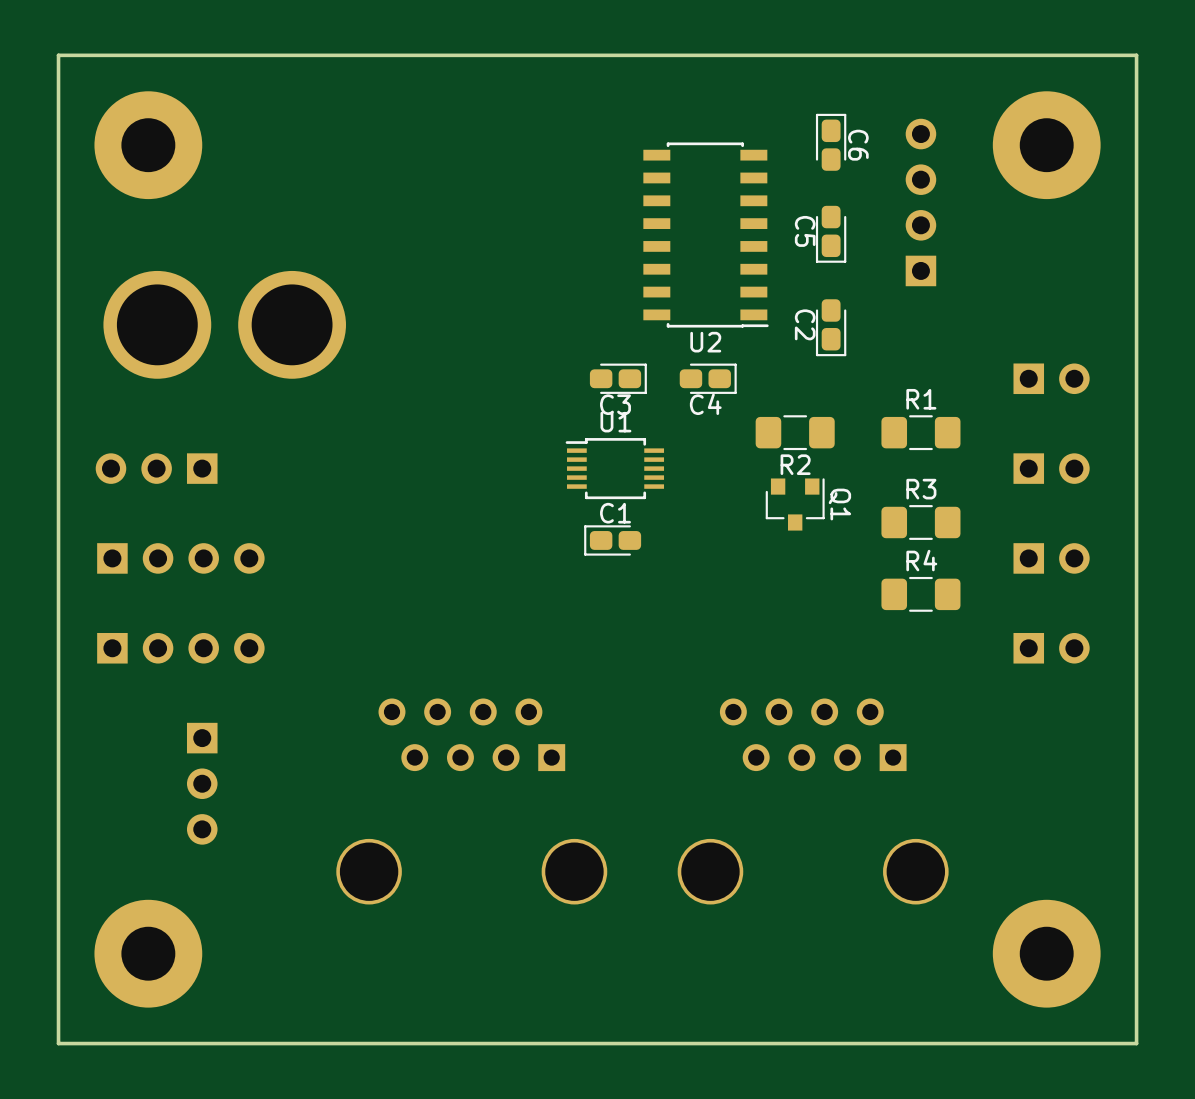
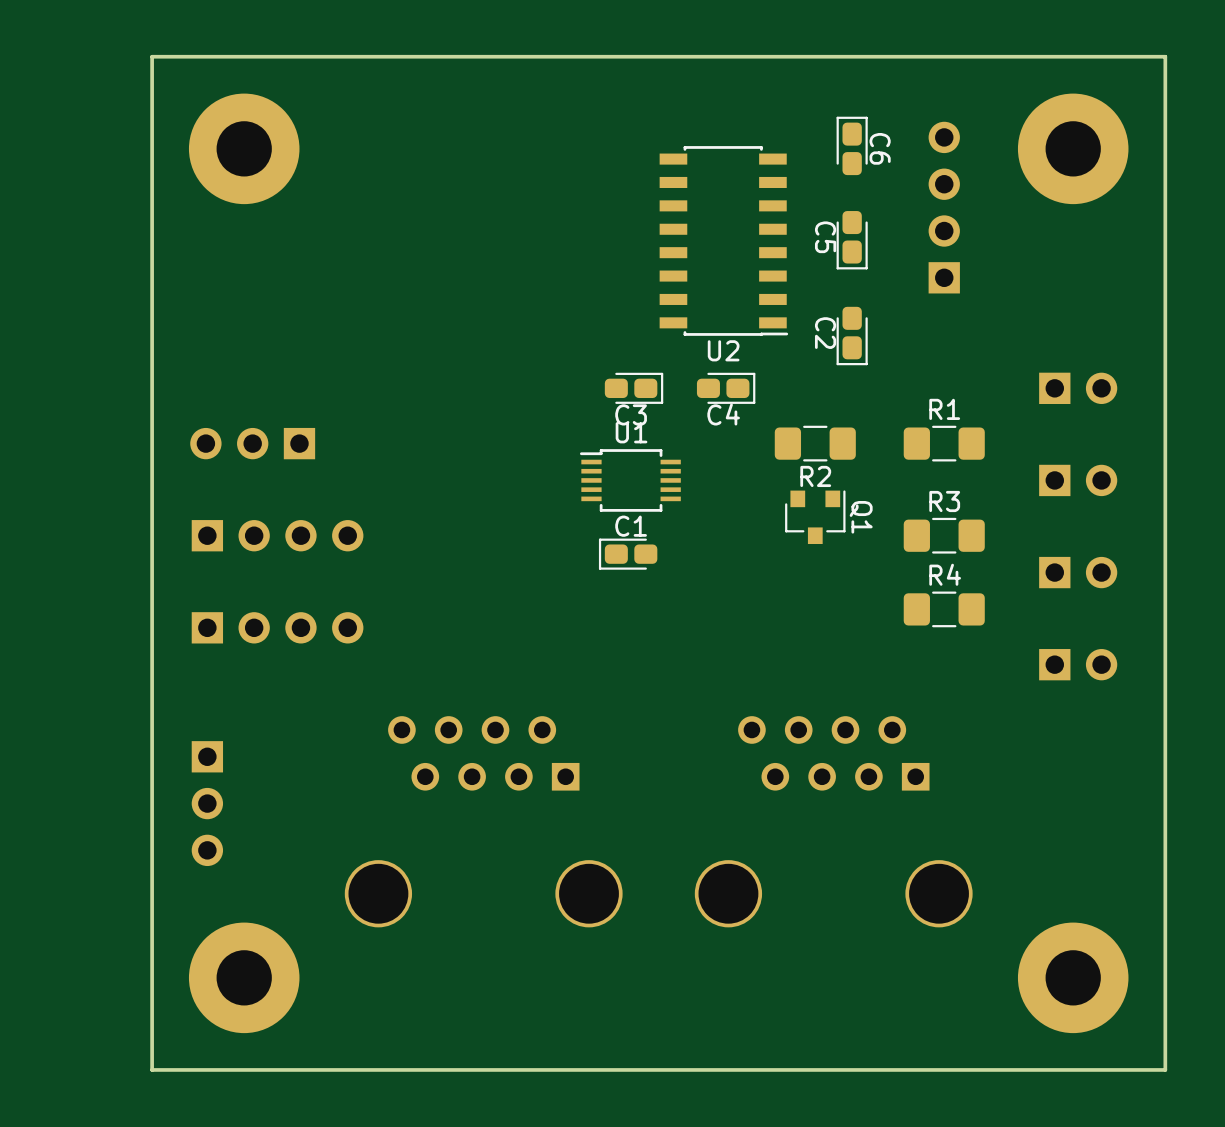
board edge: (148, 55) (58, 55) (58, 1043) (148, 1043) -> (152, 56) (152, 1069)
part position: (148, 145) -> (244, 148)
part: (224, 324) -> none
part position: (156, 468) -> (252, 443)
part: none -> (277, 535)
part: (180, 558) -> none
part: none -> (277, 627)
part: (180, 648) -> none
part position: (148, 953) -> (244, 977)

